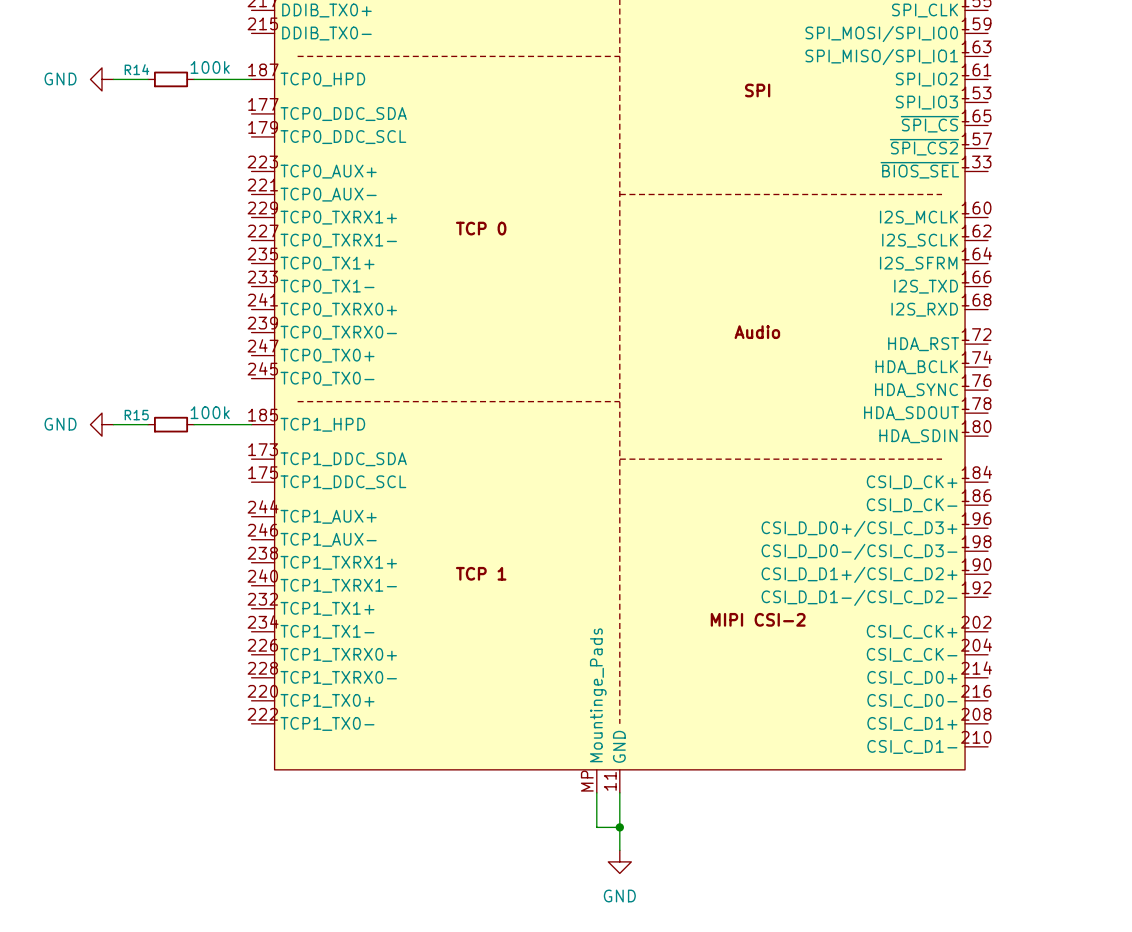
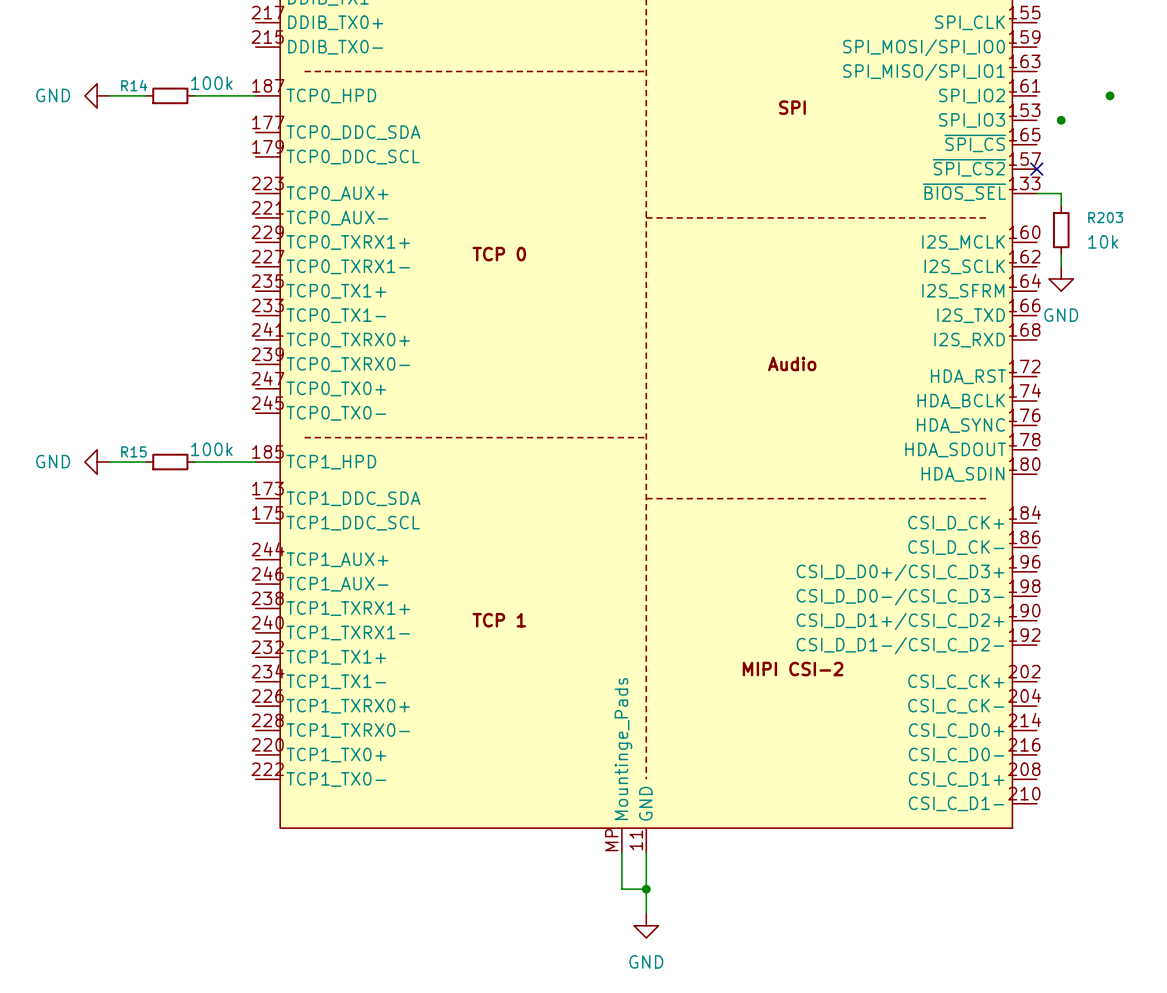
junction: none -> (1110, 95)
junction: none -> (1061, 120)
no-connect mark: none -> (1036, 169)
wire: none -> (1036, 193) (1061, 193) (1061, 205)
R203: none -> 10k (1061, 230)
wire: none -> (1061, 254) (1061, 266)
power symbol: none -> GND (1061, 278)

